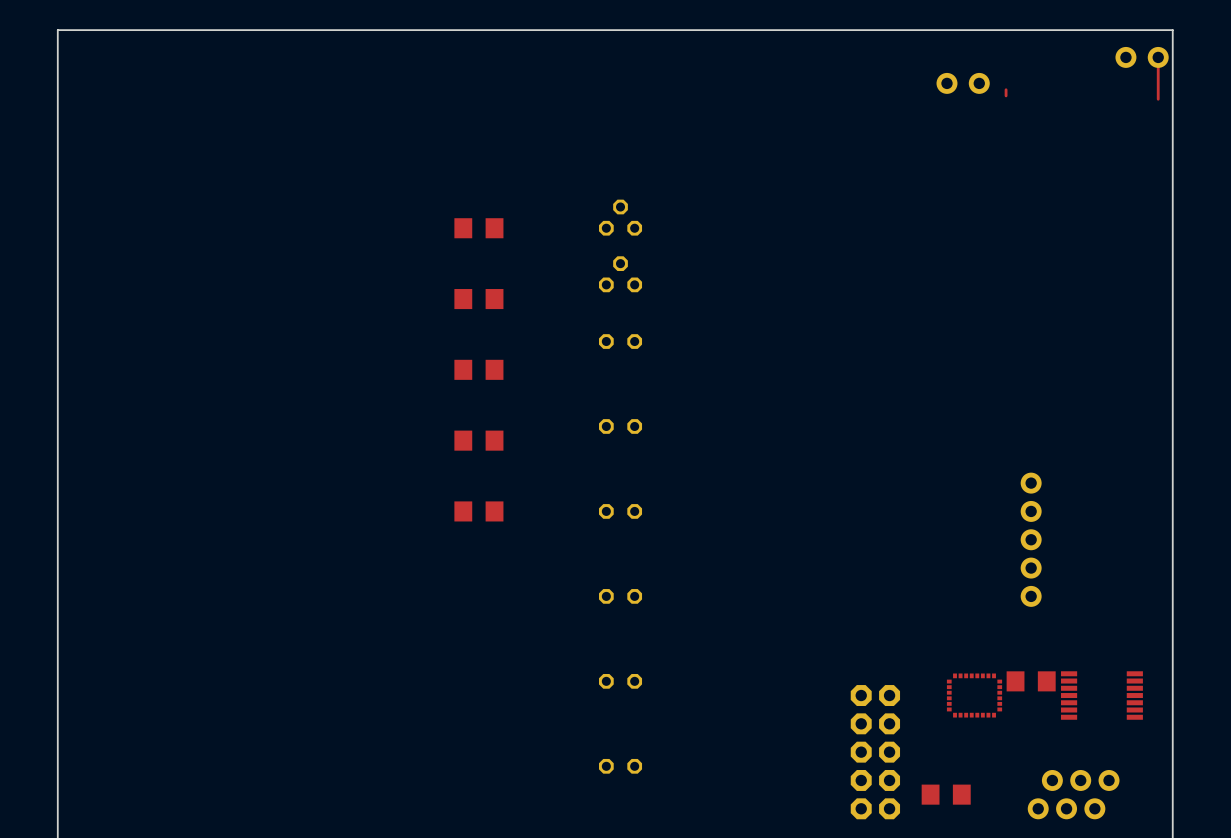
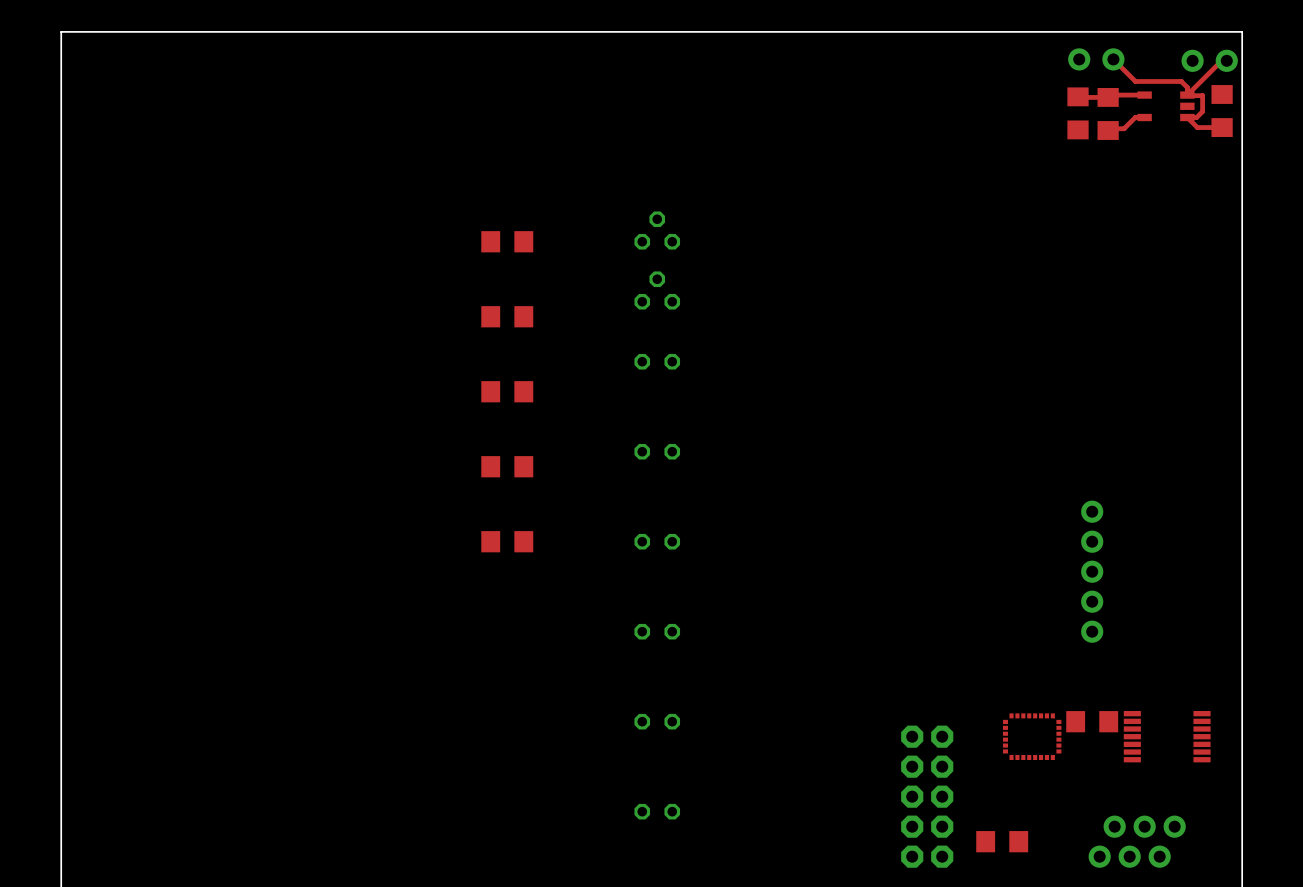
top track: none -> (1113, 59) (1135, 81) (1181, 81) (1187, 87) (1187, 95)
top track: (1158, 57) (1158, 99) -> (1226, 60) (1221, 60) (1187, 95)
part position: (963, 83) -> (1096, 59)
top track: (1006, 89) (1006, 95) -> none
top track: none -> (1144, 95) (1078, 96)
top track: none -> (1187, 95) (1202, 95) (1202, 111) (1196, 117) (1187, 117) (1197, 127) (1222, 127)
part: none -> (1166, 106)
part: none -> (1222, 111)
part: none -> (1078, 113)
part: none -> (1108, 113)
top track: none -> (1144, 117) (1135, 117) (1124, 128) (1109, 128) (1108, 130)

